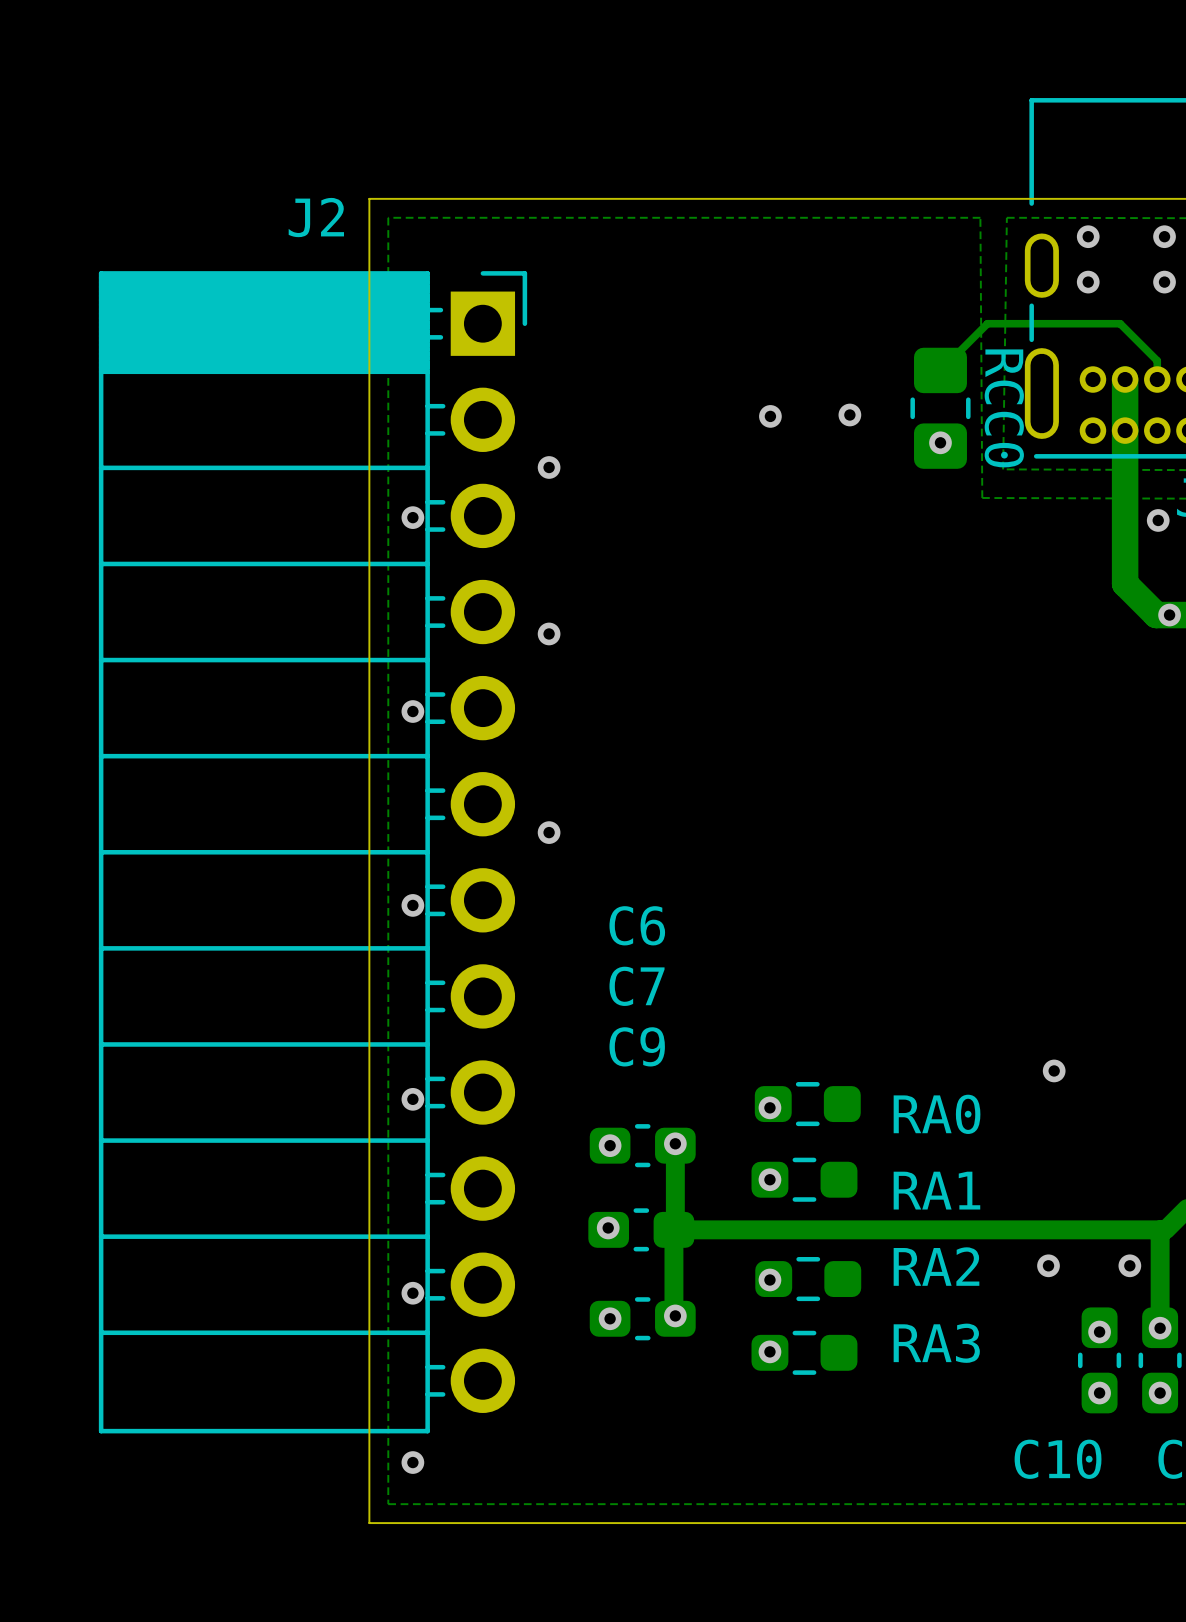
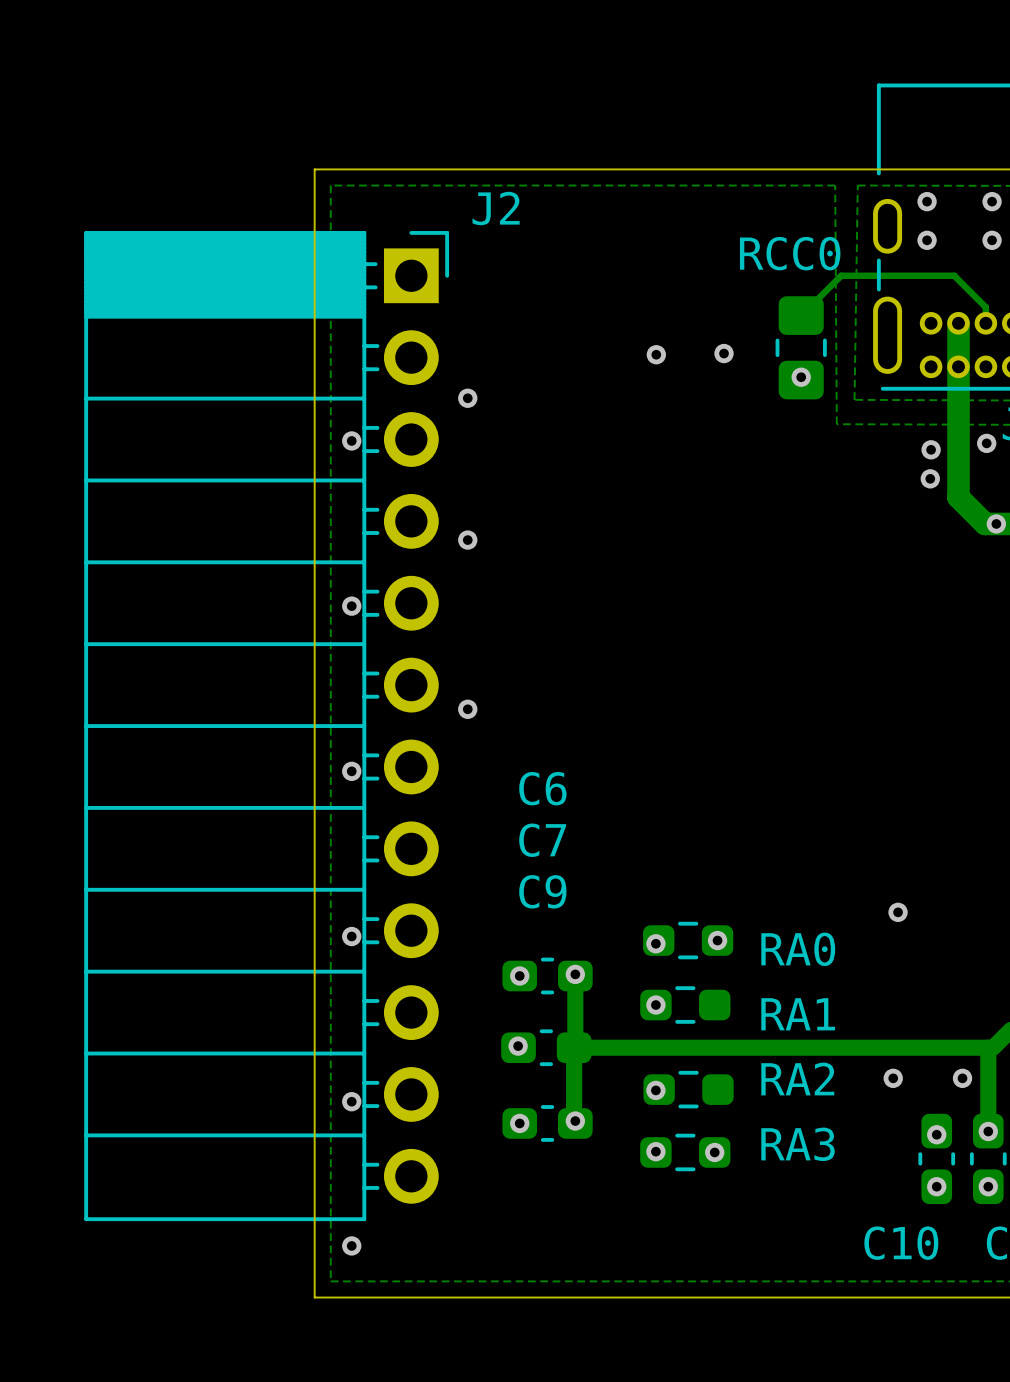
J2 name position: J2 (316, 217) -> J2 (496, 208)
RCC0 name rotation: 0° (1004, 408) -> 90° counterclockwise (790, 253)
via: none -> (931, 449)
via: none -> (930, 478)
via: none -> (717, 940)
via: none -> (714, 1152)

